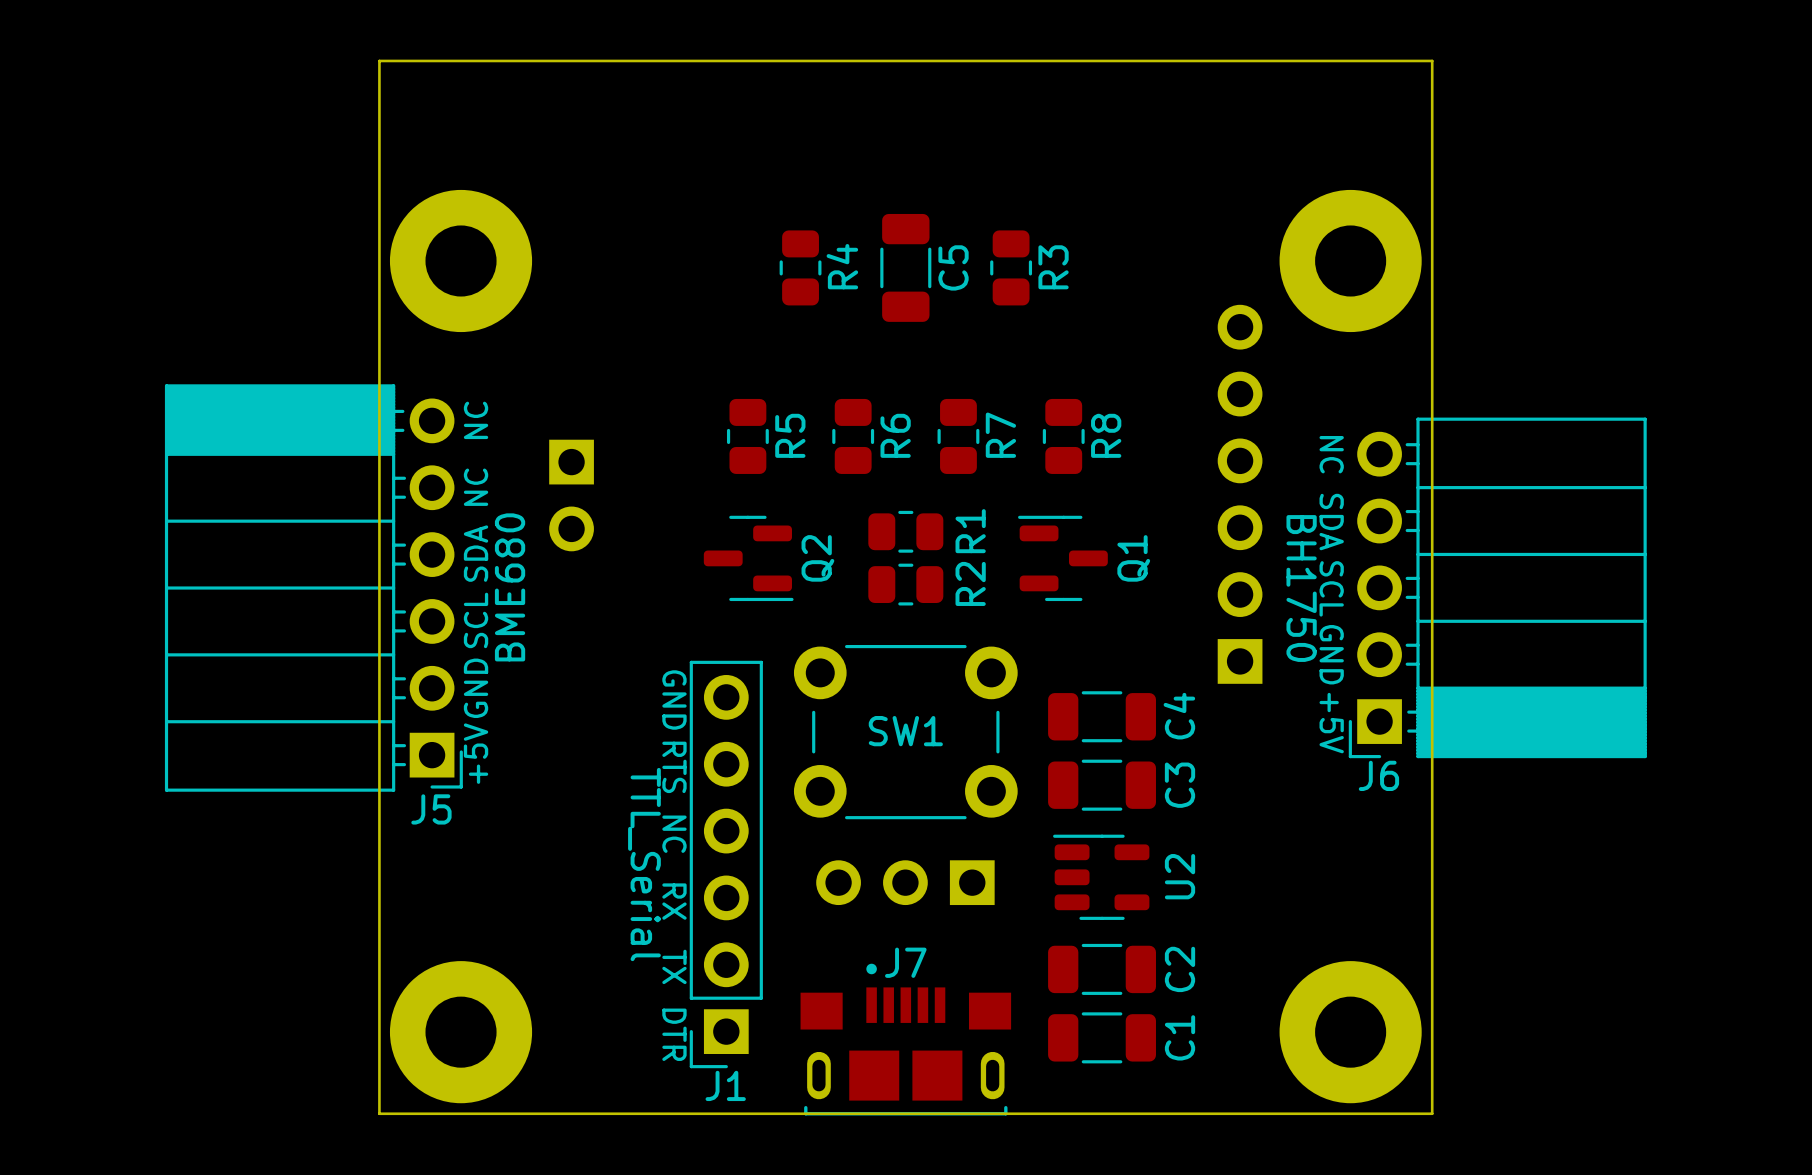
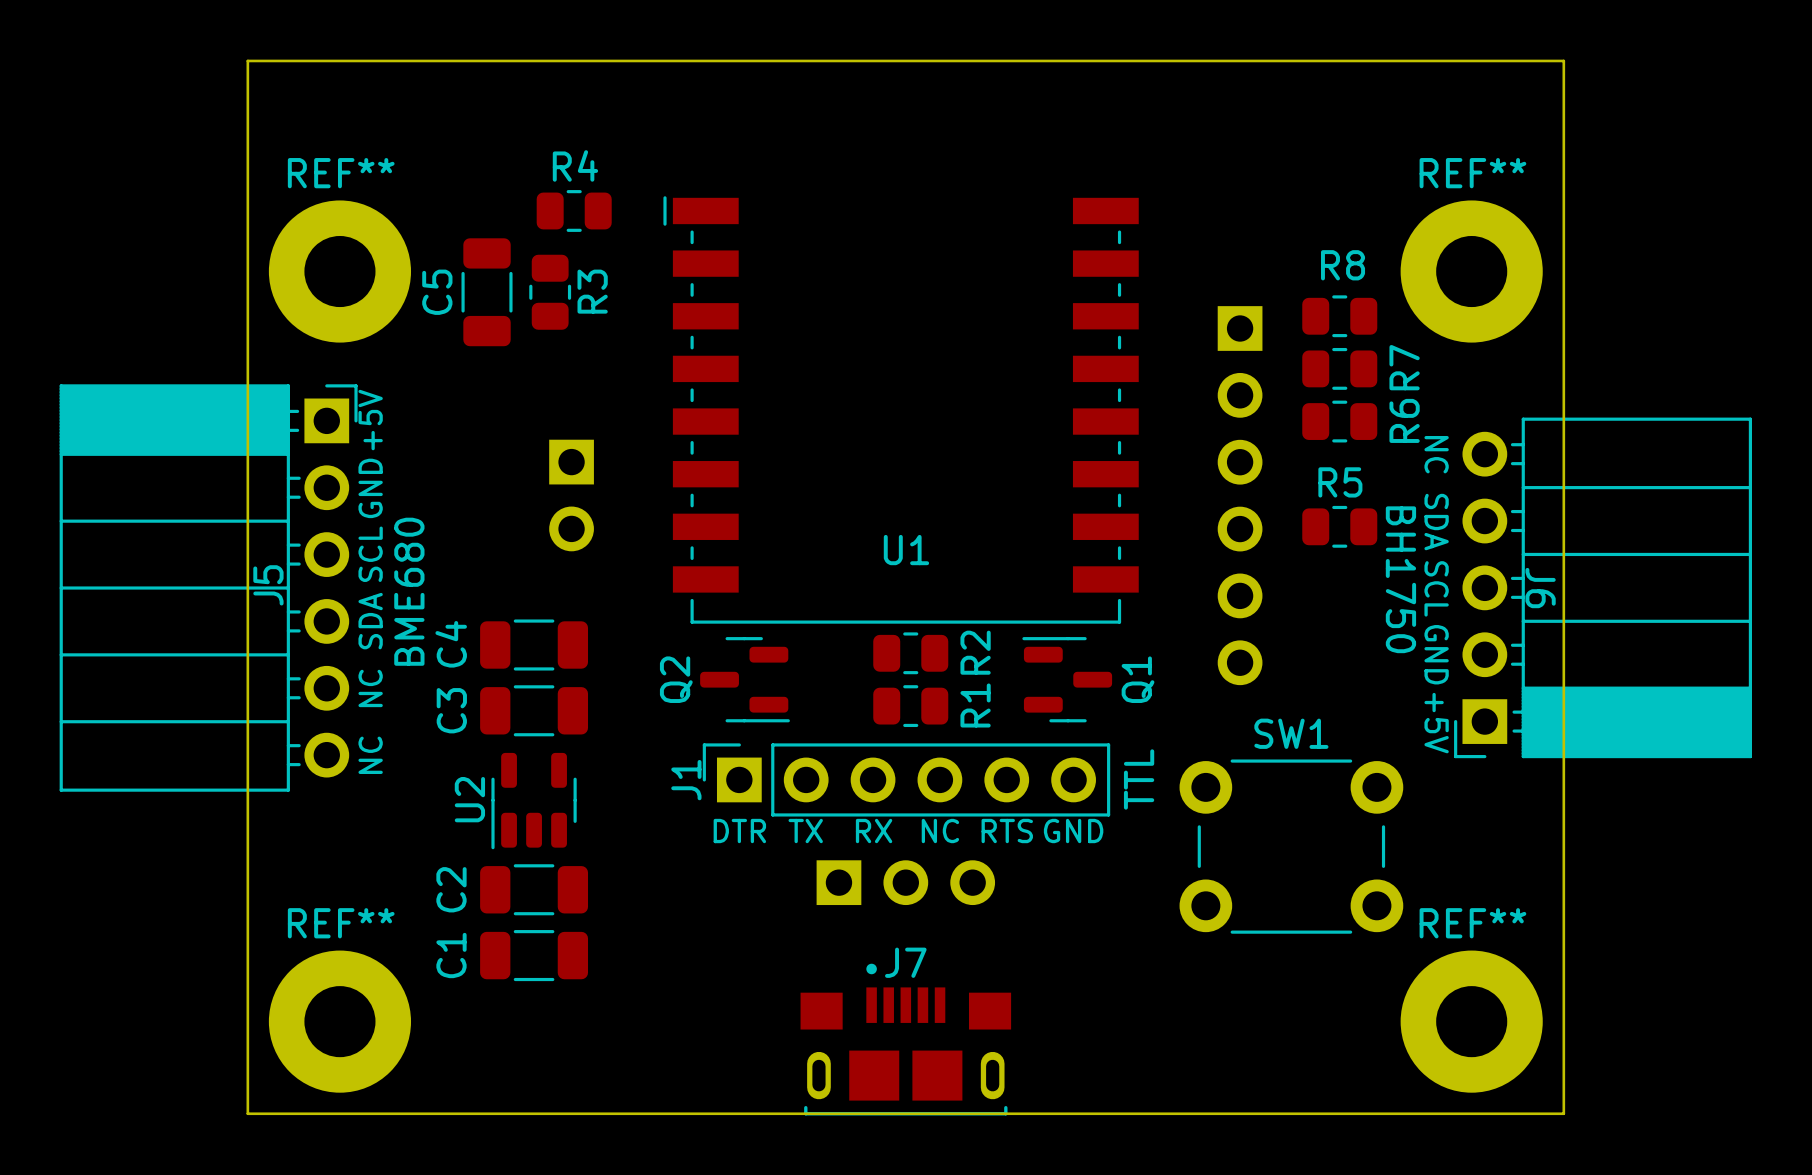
board edge: (379, 60) (379, 1113) -> (379, 60) (247, 60) (247, 1113) (379, 1113)
board edge: (1432, 60) (1432, 1113) -> (1432, 60) (1563, 60) (1563, 1113) (1432, 1113)
part: (461, 260) -> none
part: (1350, 260) -> none
R4 name position: R4 (842, 266) -> R4 (575, 165)
R4 rotation: 0° (800, 267) -> 90° clockwise (574, 210)
R4 position: (800, 267) -> (574, 210)
C5 position: (905, 267) -> (487, 292)
C5 name position: C5 (953, 267) -> C5 (437, 292)
R3 position: (1011, 267) -> (550, 292)
REF**: none -> (339, 271)
REF**: none -> (1471, 271)
J5 footprint: [164, 384, 463, 792] -> [59, 384, 358, 792]
U1: none -> (901, 409)
text: NC (476, 420) -> none
R5 name position: R5 (790, 435) -> R5 (1340, 482)
R8 name position: R8 (1106, 435) -> R8 (1343, 265)
R5 rotation: 0° (747, 436) -> 90° clockwise (1339, 526)
R5 position: (747, 436) -> (1339, 526)
R6 rotation: 0° (853, 436) -> 90° clockwise (1339, 421)
R6 position: (853, 436) -> (1339, 421)
R7 rotation: 0° (958, 436) -> 90° clockwise (1339, 368)
R7 position: (958, 436) -> (1339, 368)
R8 rotation: 0° (1063, 436) -> 90° clockwise (1339, 316)
R8 position: (1063, 436) -> (1339, 316)
text position: NC (1331, 454) -> NC (1436, 454)
text: NC (476, 487) -> none
text: none -> GND (370, 488)
part rotation: 0° (1240, 494) -> 180° (1240, 495)
text position: SDA (1331, 522) -> SDA (1436, 522)
R1 position: (905, 531) -> (910, 706)
text position: SDA (476, 553) -> SDA (370, 621)
Q2 position: (748, 558) -> (745, 679)
Q2 name position: Q2 (817, 558) -> Q2 (676, 679)
Q1 position: (1062, 558) -> (1067, 679)
R2 position: (905, 584) -> (910, 653)
J6 position: (1497, 587) -> (1603, 587)
J6 value position: BH1750 (1301, 588) -> BH1750 (1400, 579)
text position: SCL (1331, 588) -> SCL (1436, 588)
text position: SCL (476, 620) -> SCL (370, 554)
text position: GND (1331, 654) -> GND (1436, 654)
text: none -> NC (370, 688)
text: GND (476, 688) -> none
text: GND (674, 700) -> none
C4 position: (1102, 716) -> (534, 645)
C4 name position: C4 (1179, 716) -> C4 (451, 644)
text position: +5V (1331, 723) -> +5V (1436, 723)
SW1 name position: SW1 (905, 731) -> SW1 (1291, 733)
SW1 position: (905, 732) -> (1291, 846)
text position: +5V (476, 753) -> +5V (370, 420)
text: none -> NC (370, 755)
text rotation: 0° (674, 767) -> 90° counterclockwise (1007, 831)
text position: RTS (674, 767) -> RTS (1007, 831)
J6 name rotation: 0° (1378, 775) -> 90° clockwise (1540, 588)
J6 name position: J6 (1378, 775) -> J6 (1540, 588)
C3 position: (1102, 785) -> (534, 710)
C3 name position: C3 (1180, 785) -> C3 (451, 710)
J5 name position: J5 (431, 809) -> J5 (268, 585)
text: none -> NC (940, 831)
text: none -> GND (1073, 831)
text: NC (674, 834) -> none
J1 value: TTL_Serial (644, 864) -> TTL (1139, 779)
J1 rotation: 0° (726, 864) -> 90° clockwise (906, 779)
U2 name position: U2 (1180, 876) -> U2 (469, 799)
U2 rotation: 0° (1101, 877) -> 90° counterclockwise (534, 801)
U2 position: (1101, 877) -> (534, 801)
part rotation: 0° (905, 882) -> 180° (905, 882)
text rotation: 0° (674, 901) -> 90° counterclockwise (874, 831)
text position: RX (674, 901) -> RX (874, 831)
text rotation: 0° (674, 966) -> 90° counterclockwise (805, 831)
text position: TX (674, 966) -> TX (805, 831)
C2 position: (1102, 969) -> (534, 889)
C2 name position: C2 (1180, 969) -> C2 (451, 889)
REF**: none -> (339, 1021)
REF**: none -> (1471, 1021)
part: (461, 1032) -> none
part: (1350, 1032) -> none
text rotation: 0° (674, 1034) -> 90° counterclockwise (739, 831)
text position: DTR (674, 1034) -> DTR (739, 831)
C1 position: (1102, 1037) -> (534, 955)
C1 name position: C1 (1180, 1037) -> C1 (451, 955)

